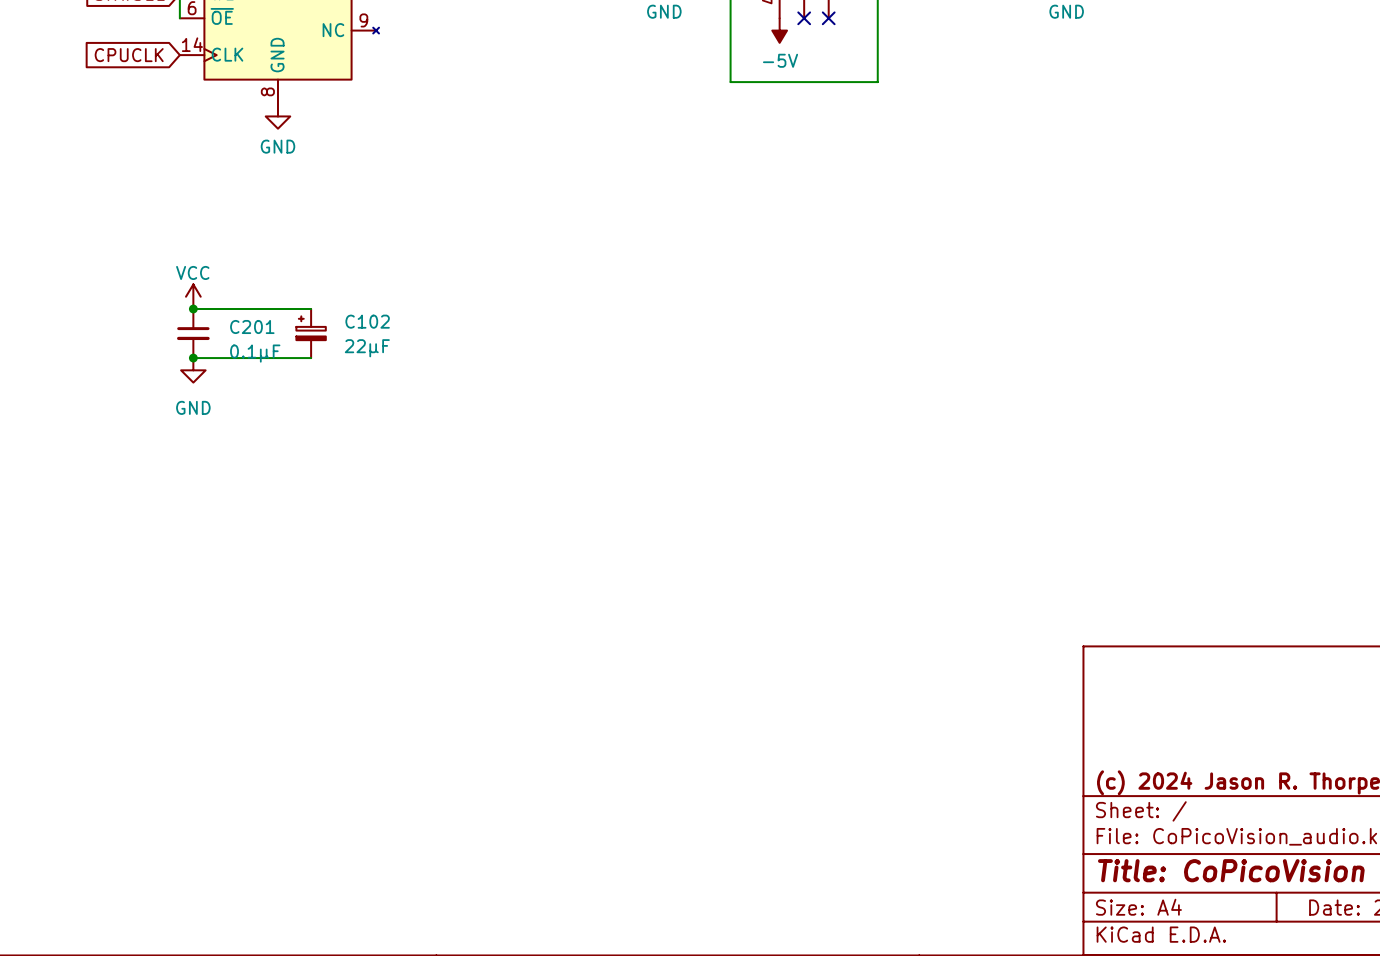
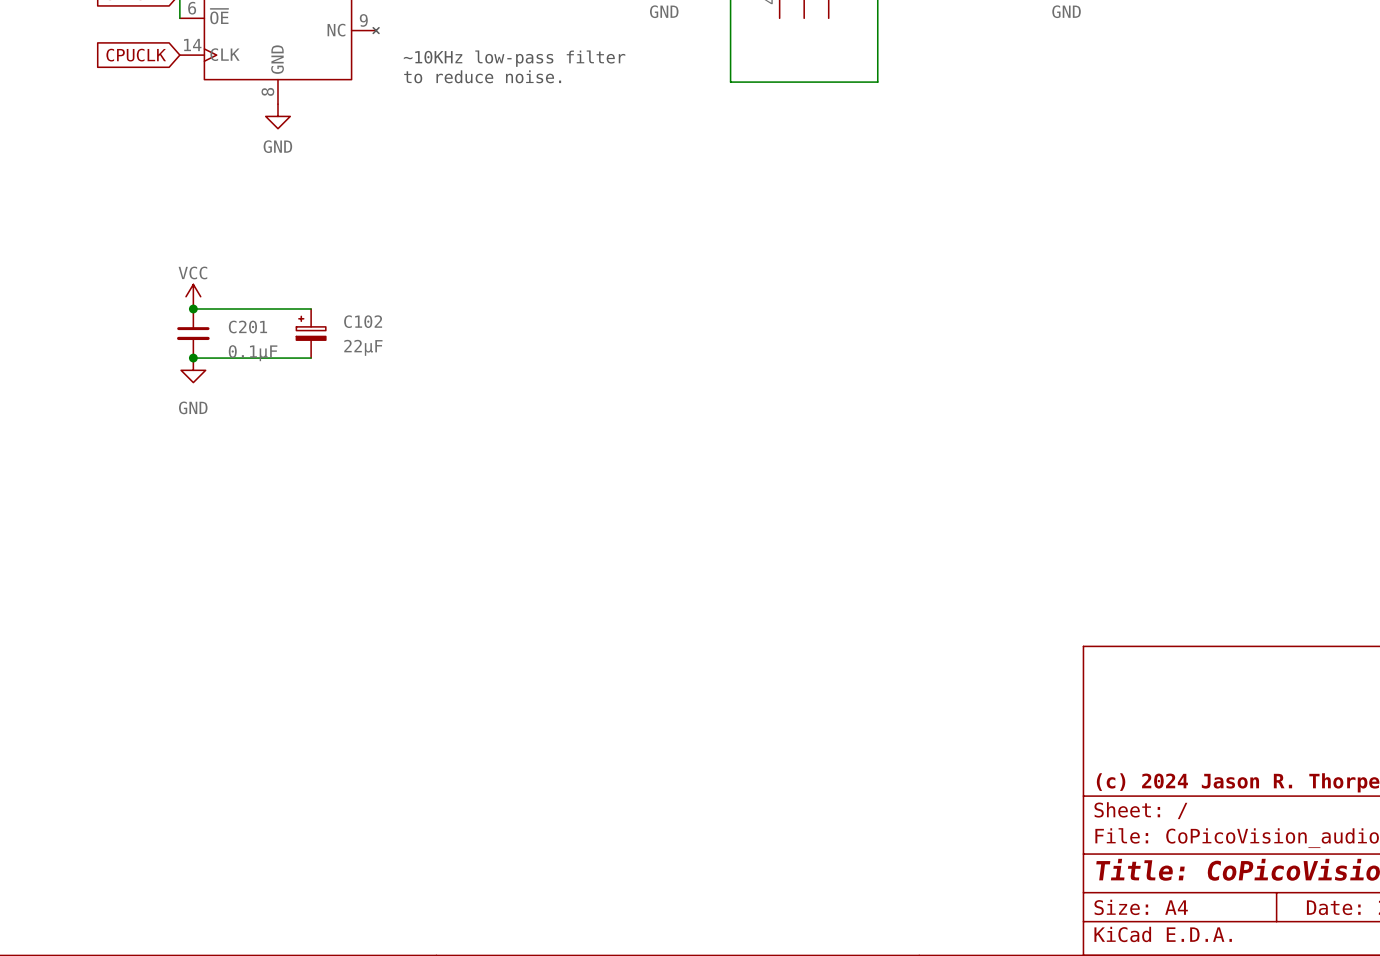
no-connect mark: (804, 18) -> none
no-connect mark: (828, 18) -> none
power symbol: -5V (779, 30) -> none
text: none -> ~10KHz low-pass filter (514, 58)
text: none -> to reduce noise. (482, 76)

